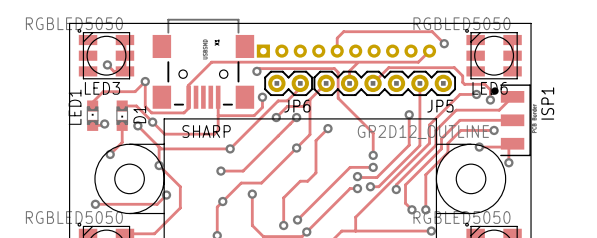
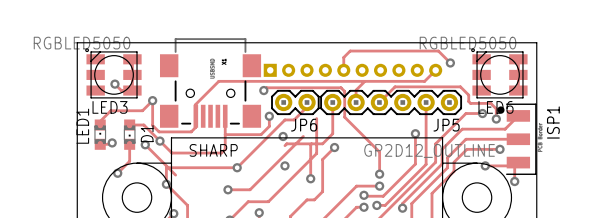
track: (326, 83) (303, 106) (287, 106) (276, 117) -> (332, 102) (332, 133) (322, 143) (286, 143) (284, 145)
via: (296, 117) -> none
track: none -> (311, 143) (310, 178)
via: none -> (284, 165)
via: (296, 147) -> none
track: none -> (168, 167) (175, 175)
via: none -> (310, 178)

